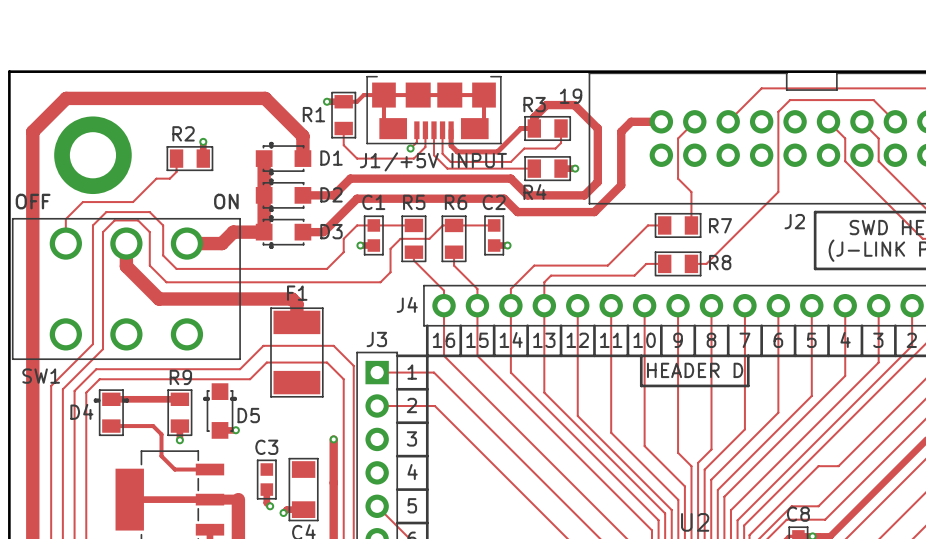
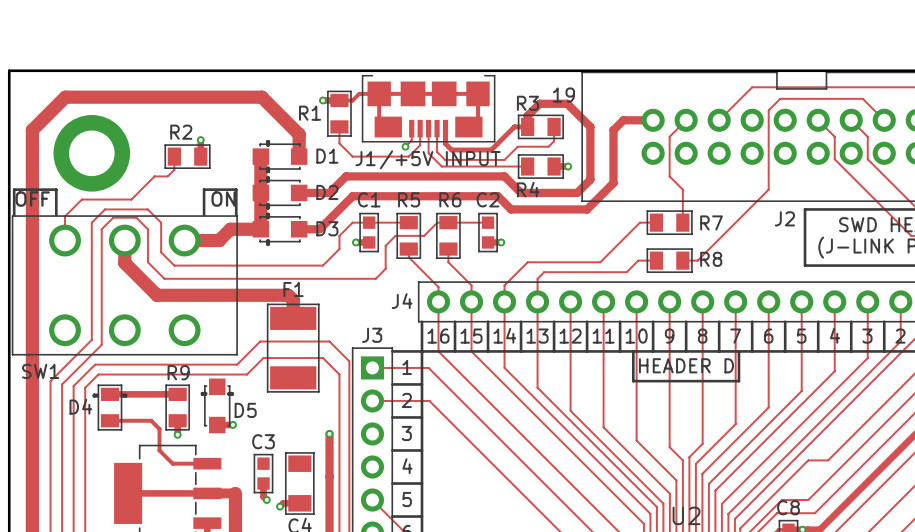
line: none -> (14, 215) (14, 189) (56, 189) (56, 215)
line: none -> (204, 215) (204, 189) (236, 189) (236, 215)

